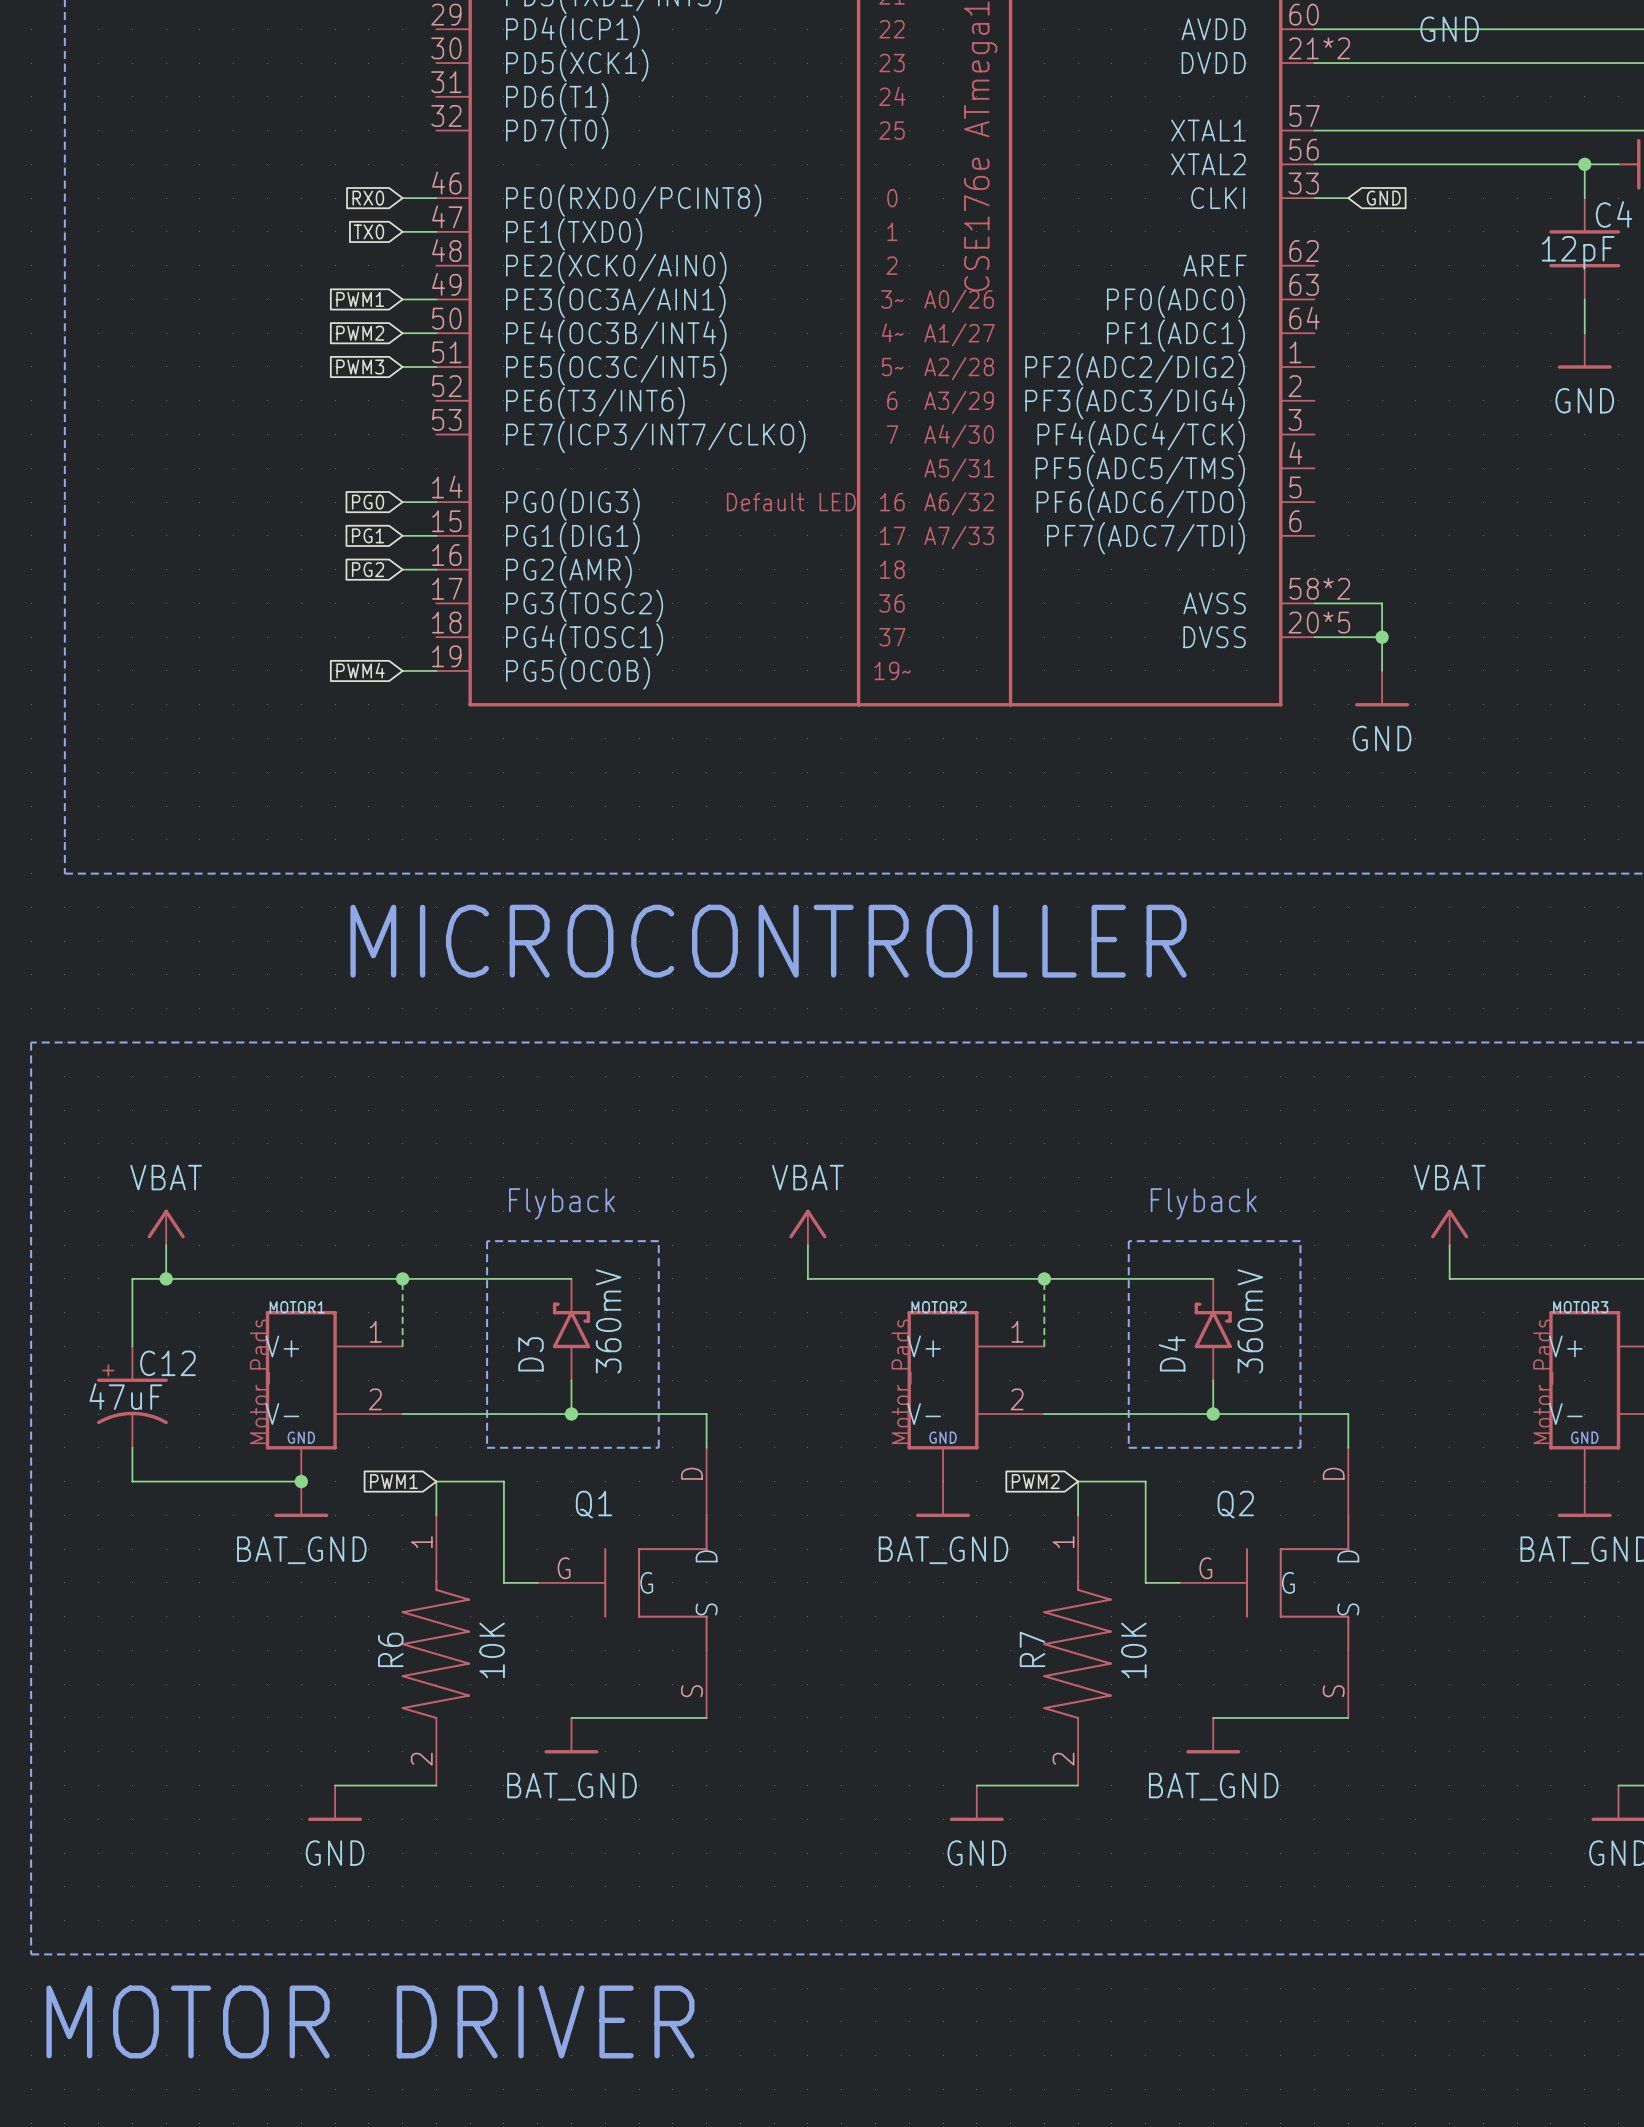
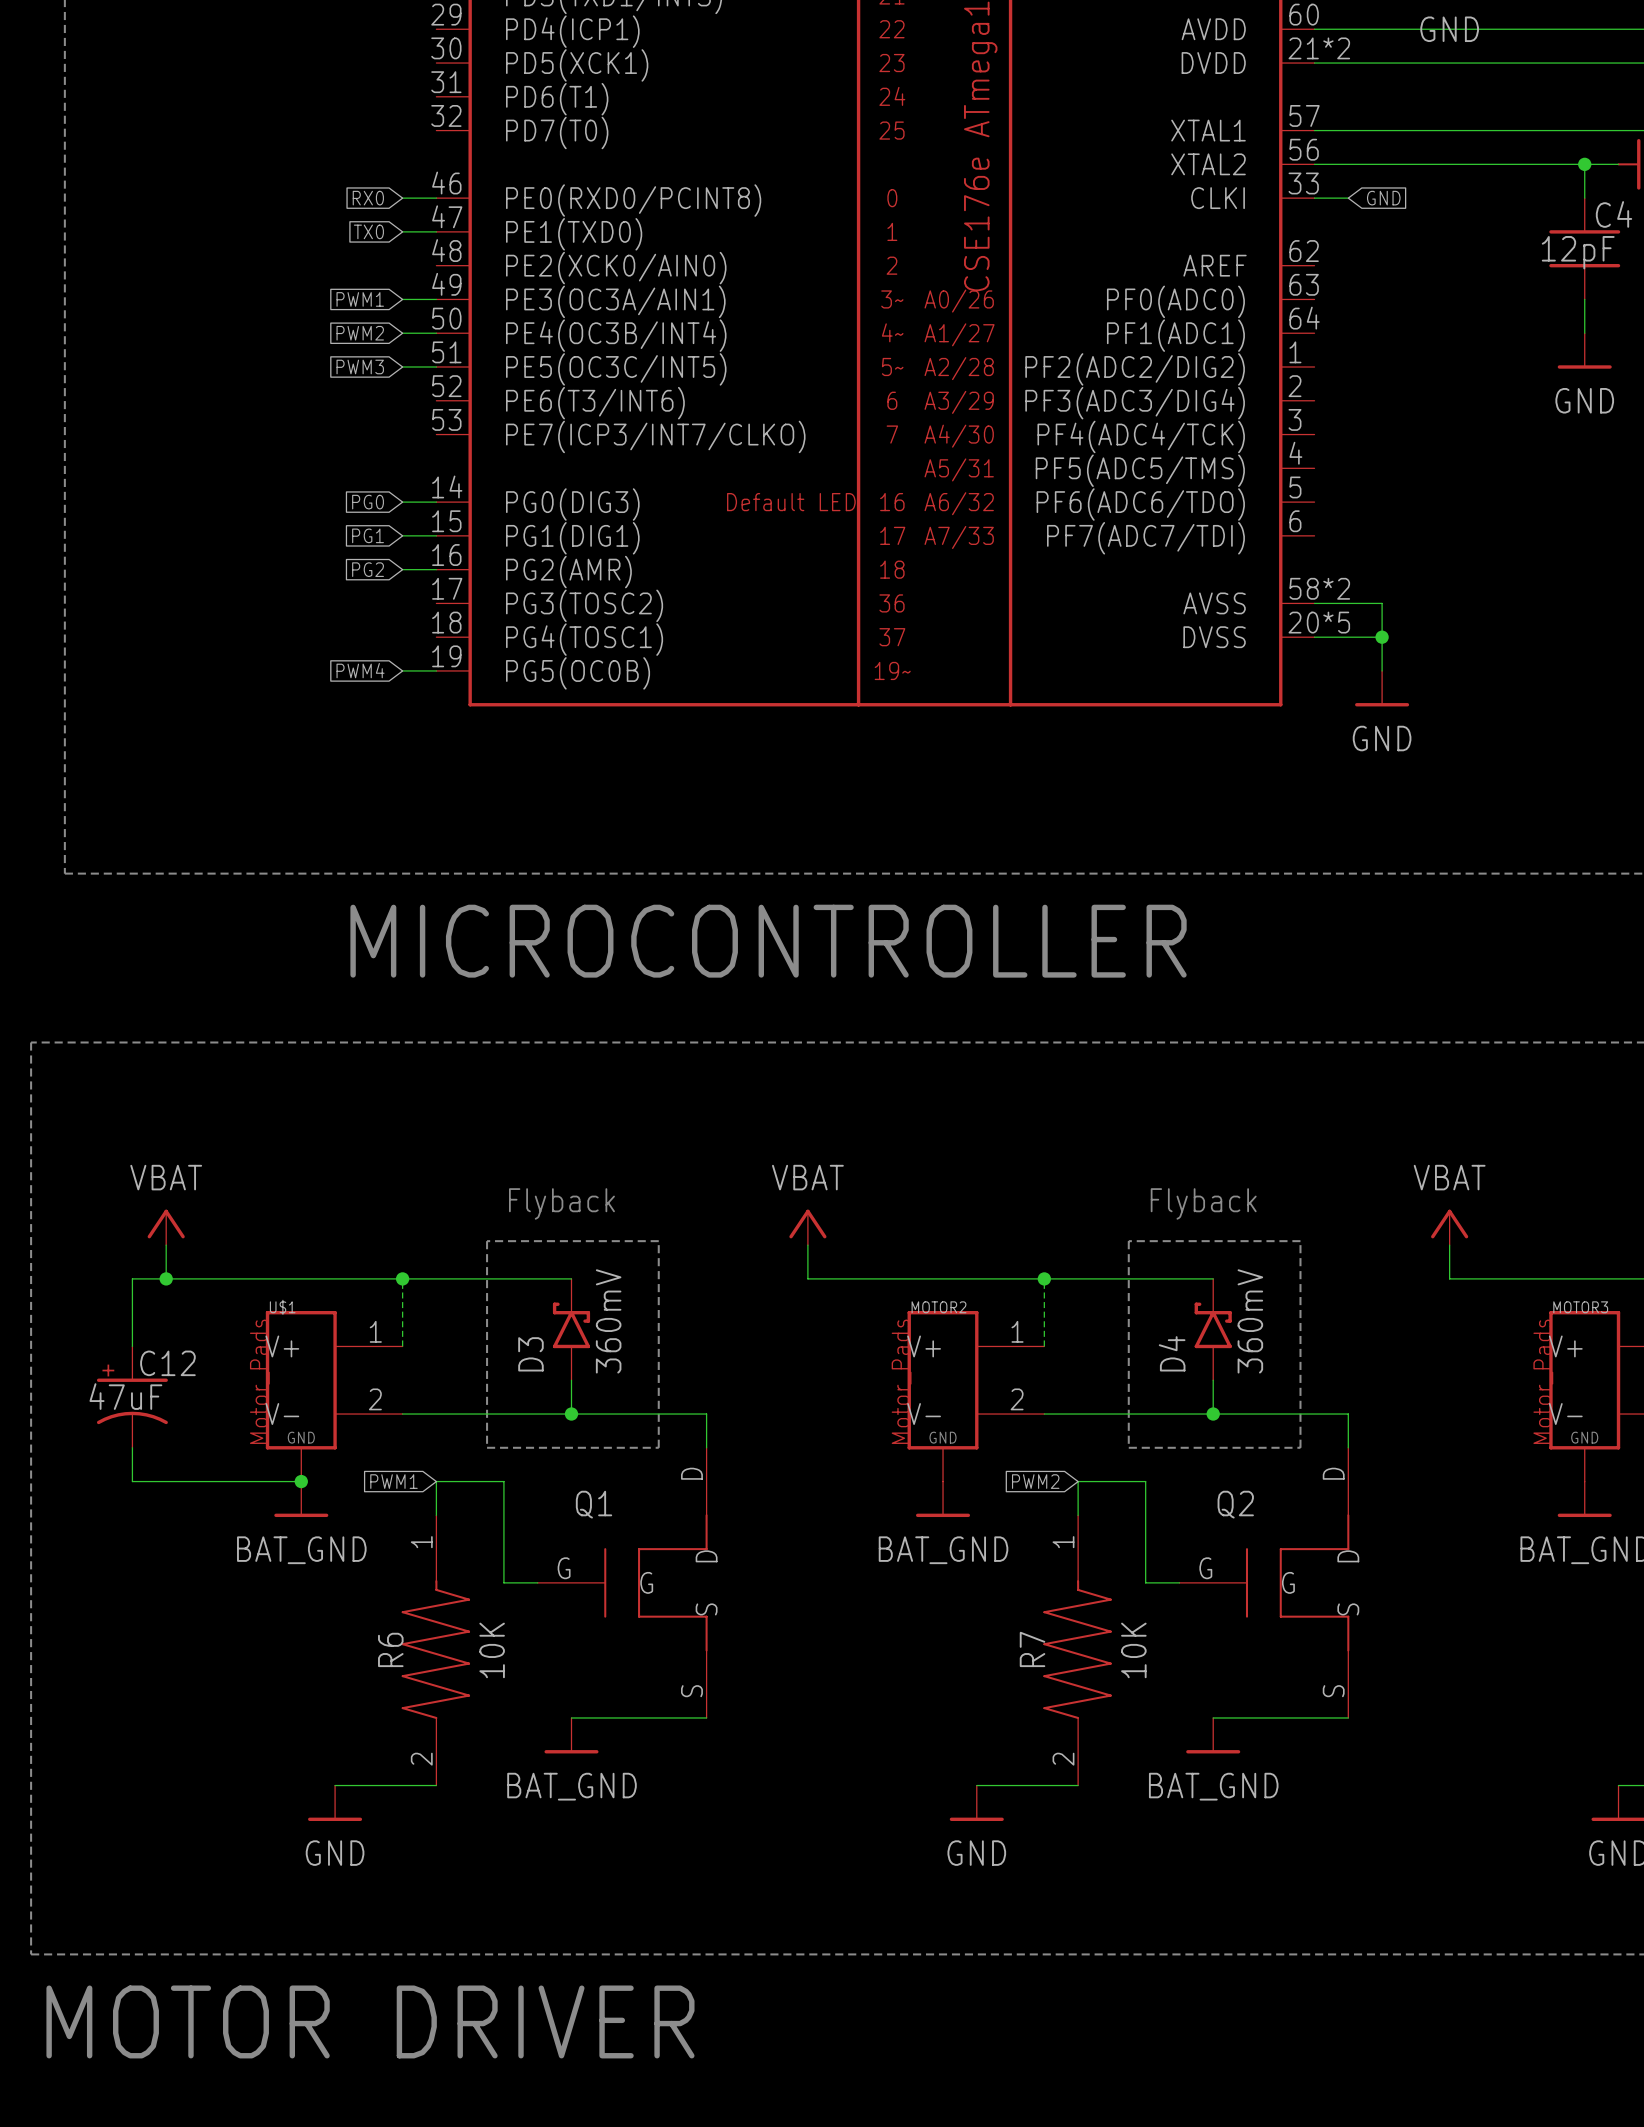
MOTOR1 name: MOTOR1 (297, 1307) -> U$1 (282, 1307)

